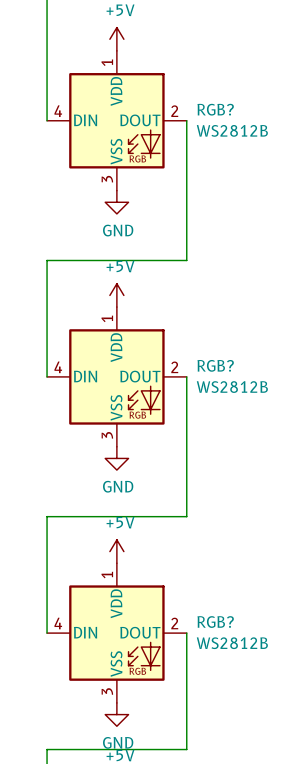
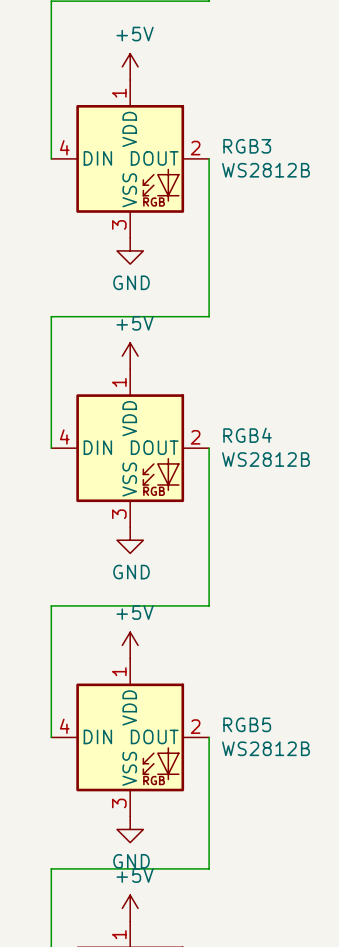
RGB? name: RGB? (215, 109) -> RGB3 (247, 146)
RGB? name: RGB? (215, 365) -> RGB4 (247, 435)
RGB? name: RGB? (215, 622) -> RGB5 (247, 724)

